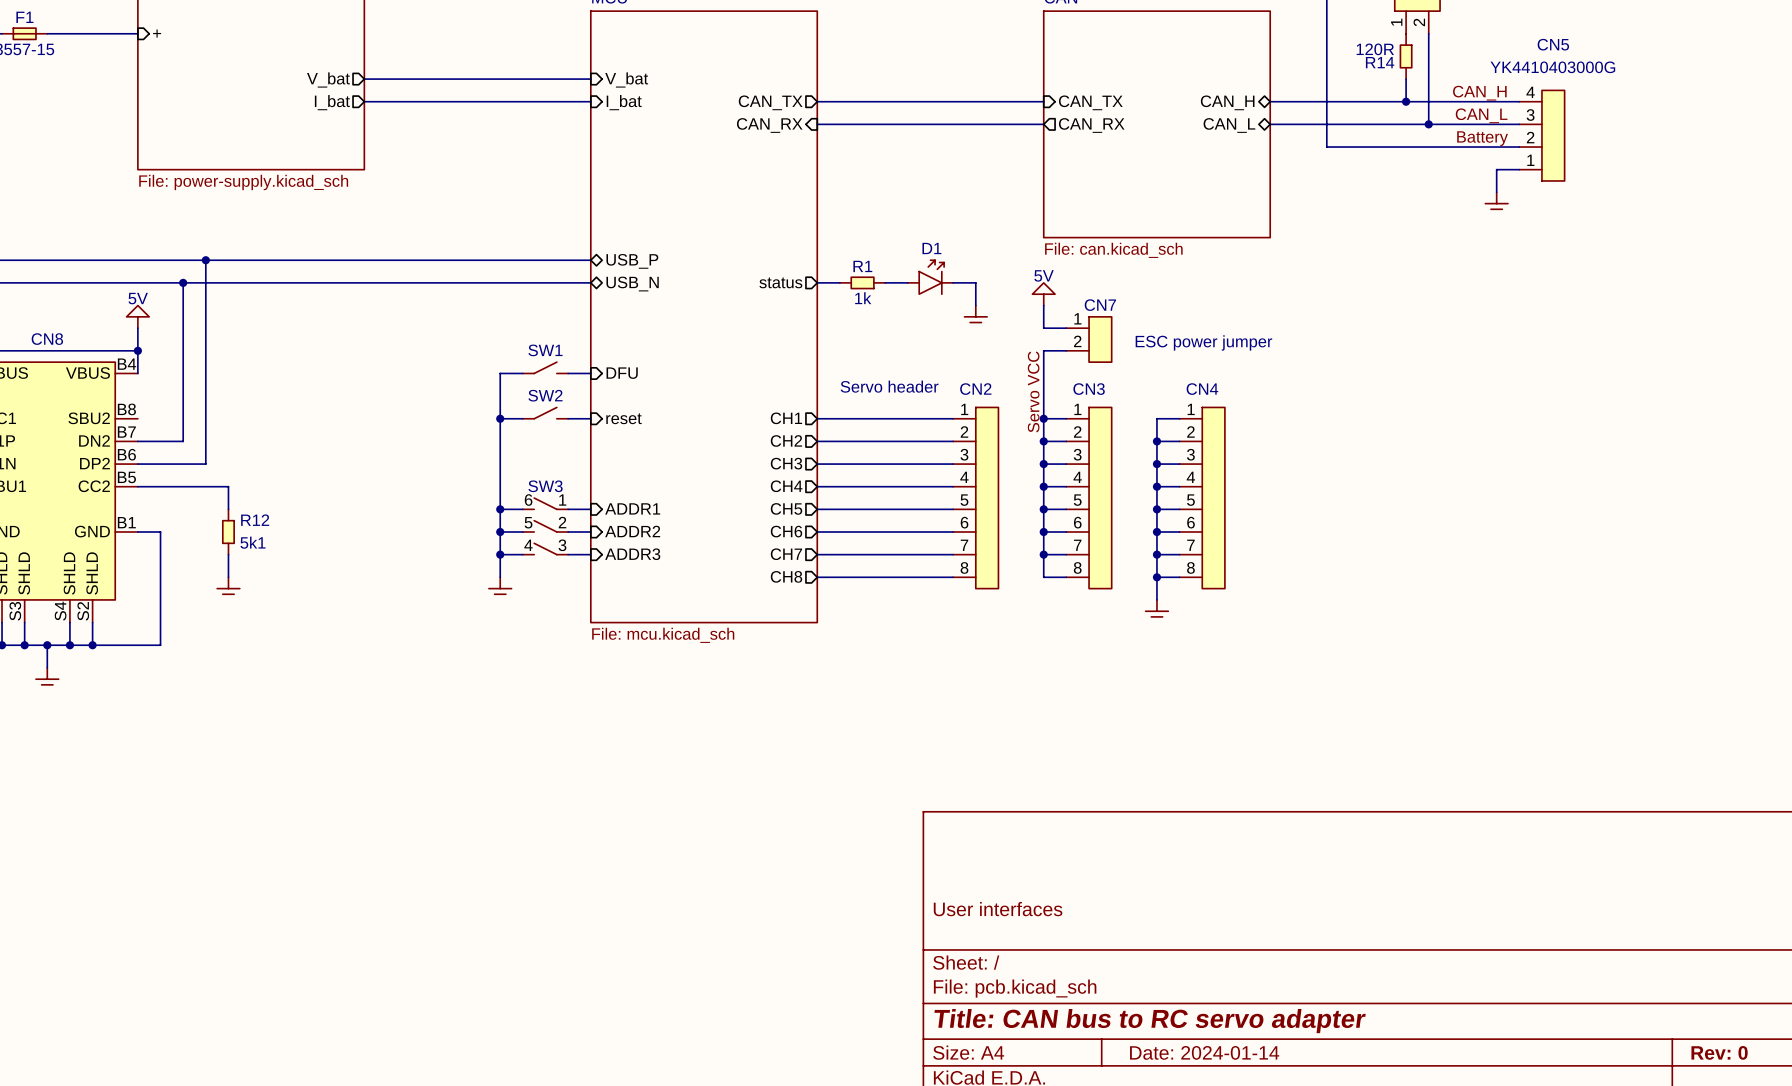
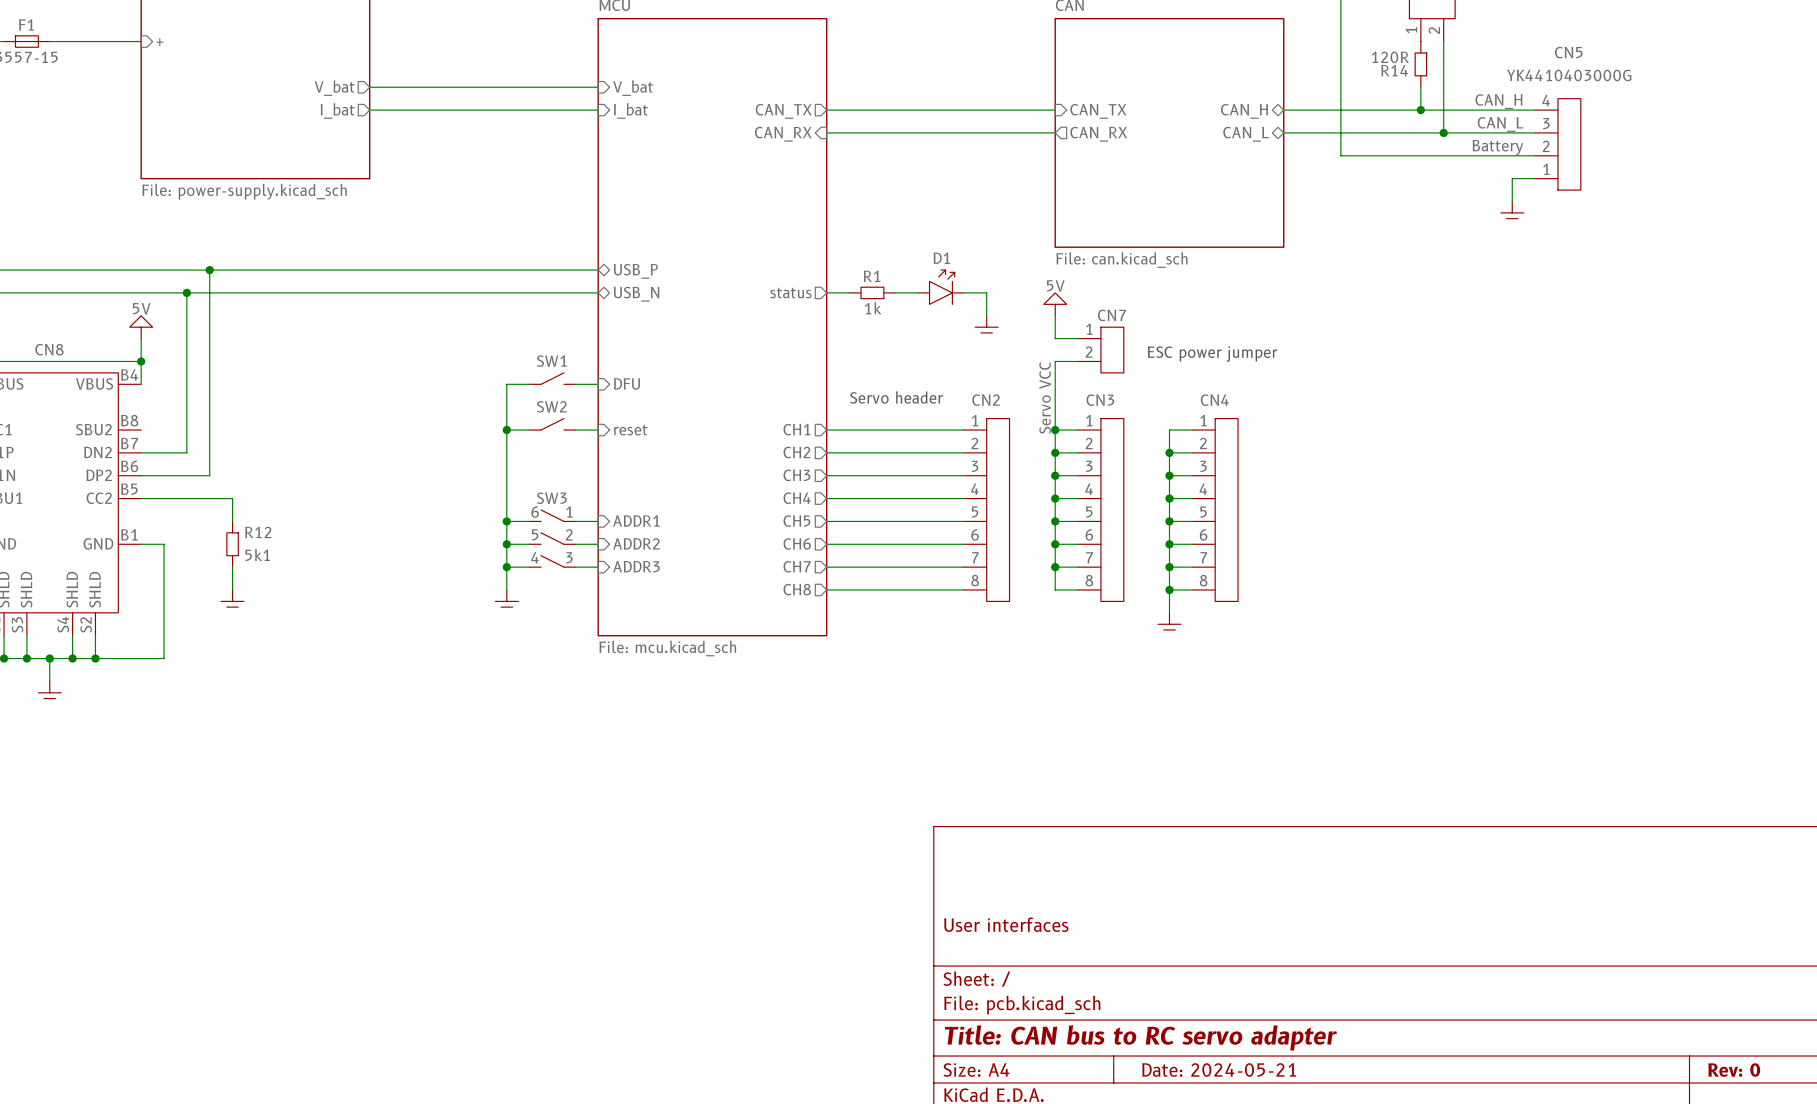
title block: Date: 2024-01-14 (1204, 1052) -> Date: 2024-05-21 (1219, 1069)

